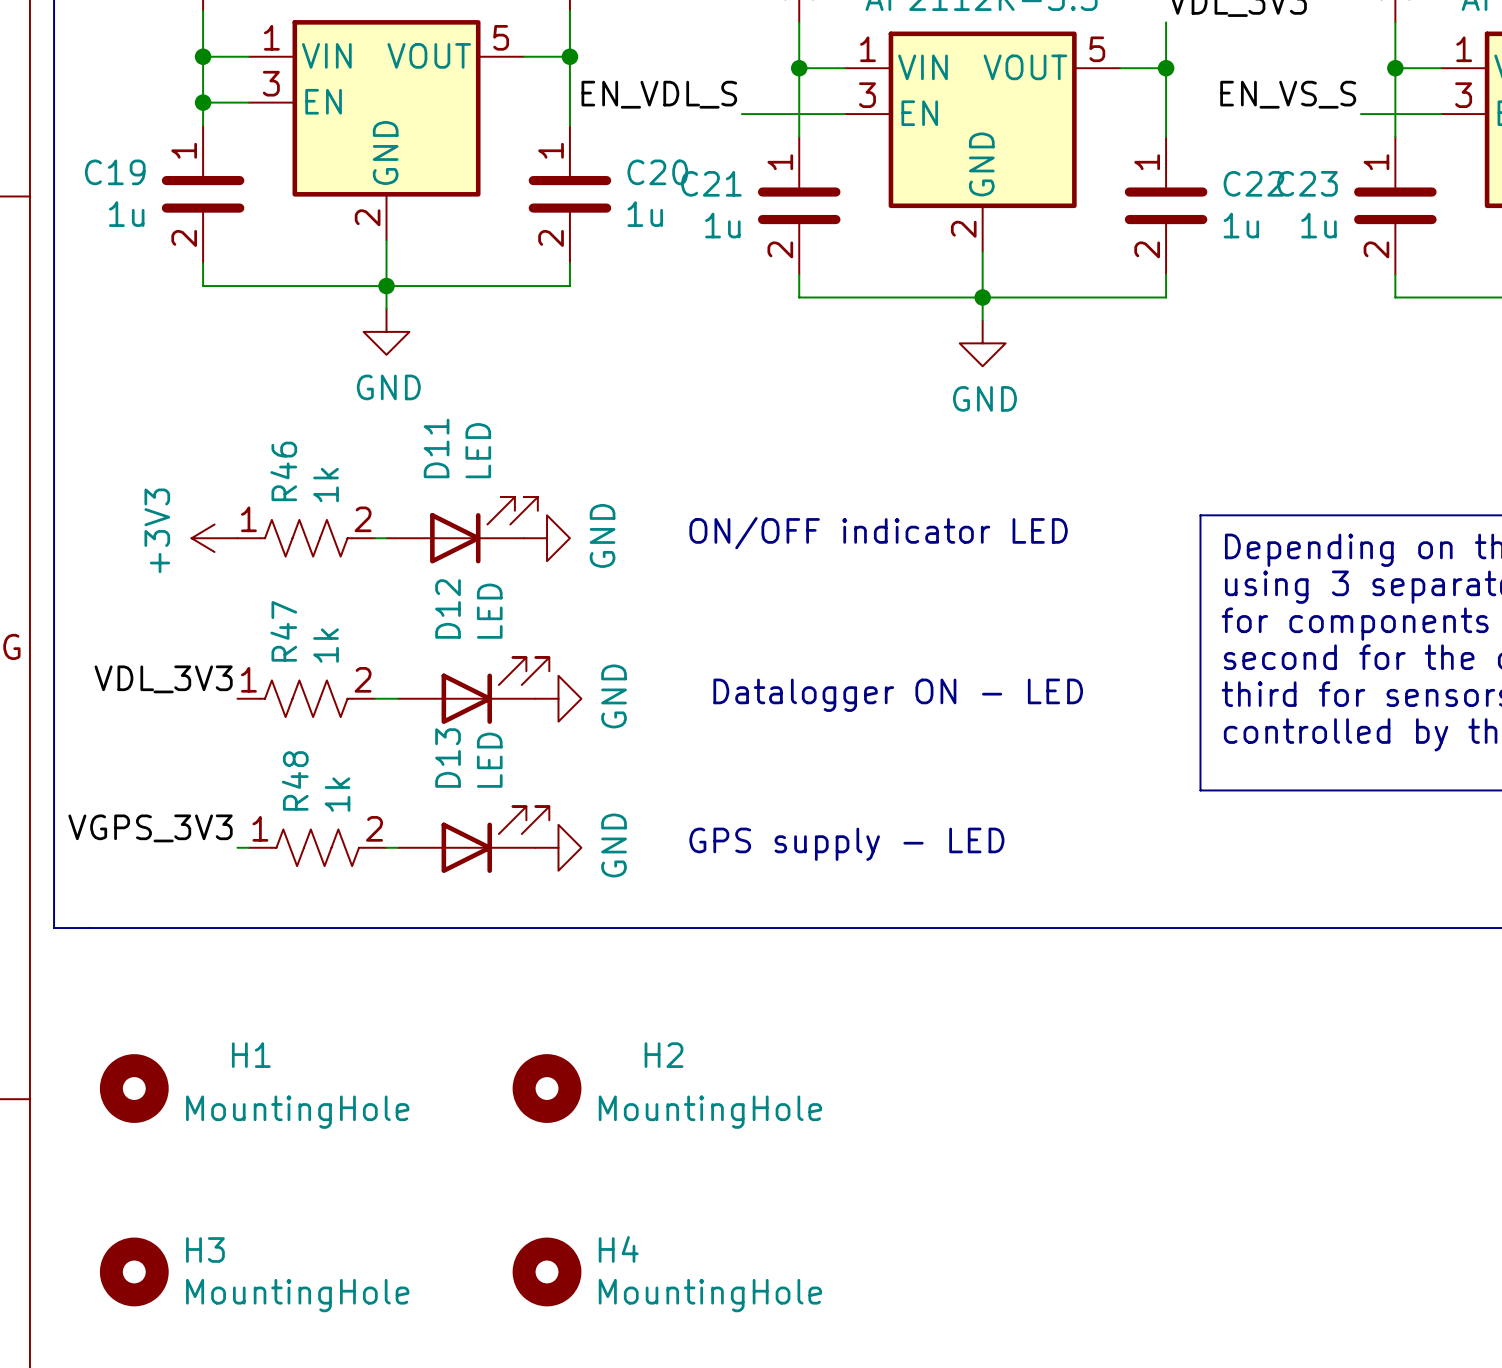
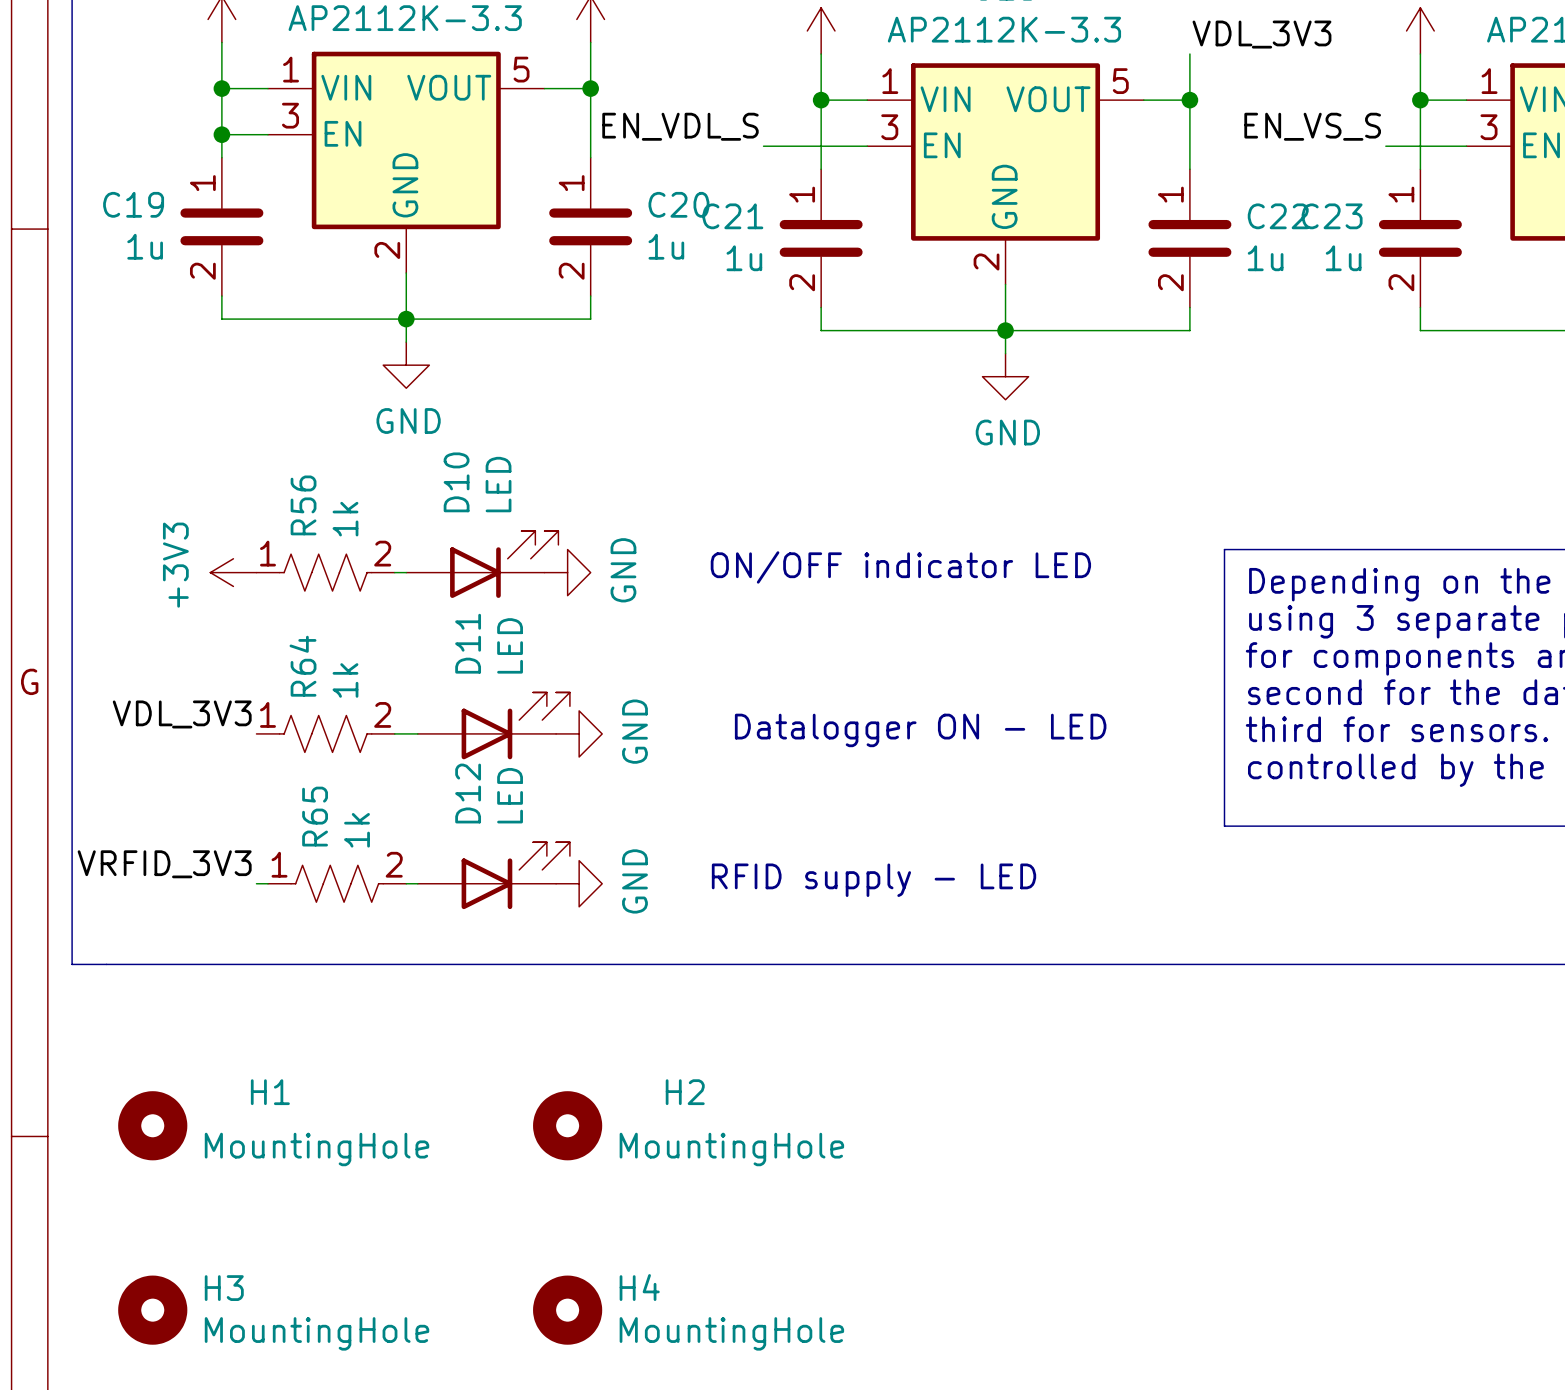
D11 name: D11 (436, 448) -> D10 (456, 482)
R46 name: R46 (283, 471) -> R56 (303, 505)
D12 name: D12 (448, 608) -> D11 (468, 643)
R47 name: R47 (283, 631) -> R64 (303, 666)
D13 name: D13 (448, 758) -> D12 (468, 793)
R48 name: R48 (295, 780) -> R65 (315, 816)
label: VGPS_3V3 (150, 828) -> VRFID_3V3 (164, 864)
text: GPS supply - LED (846, 844) -> RFID supply - LED (874, 880)

